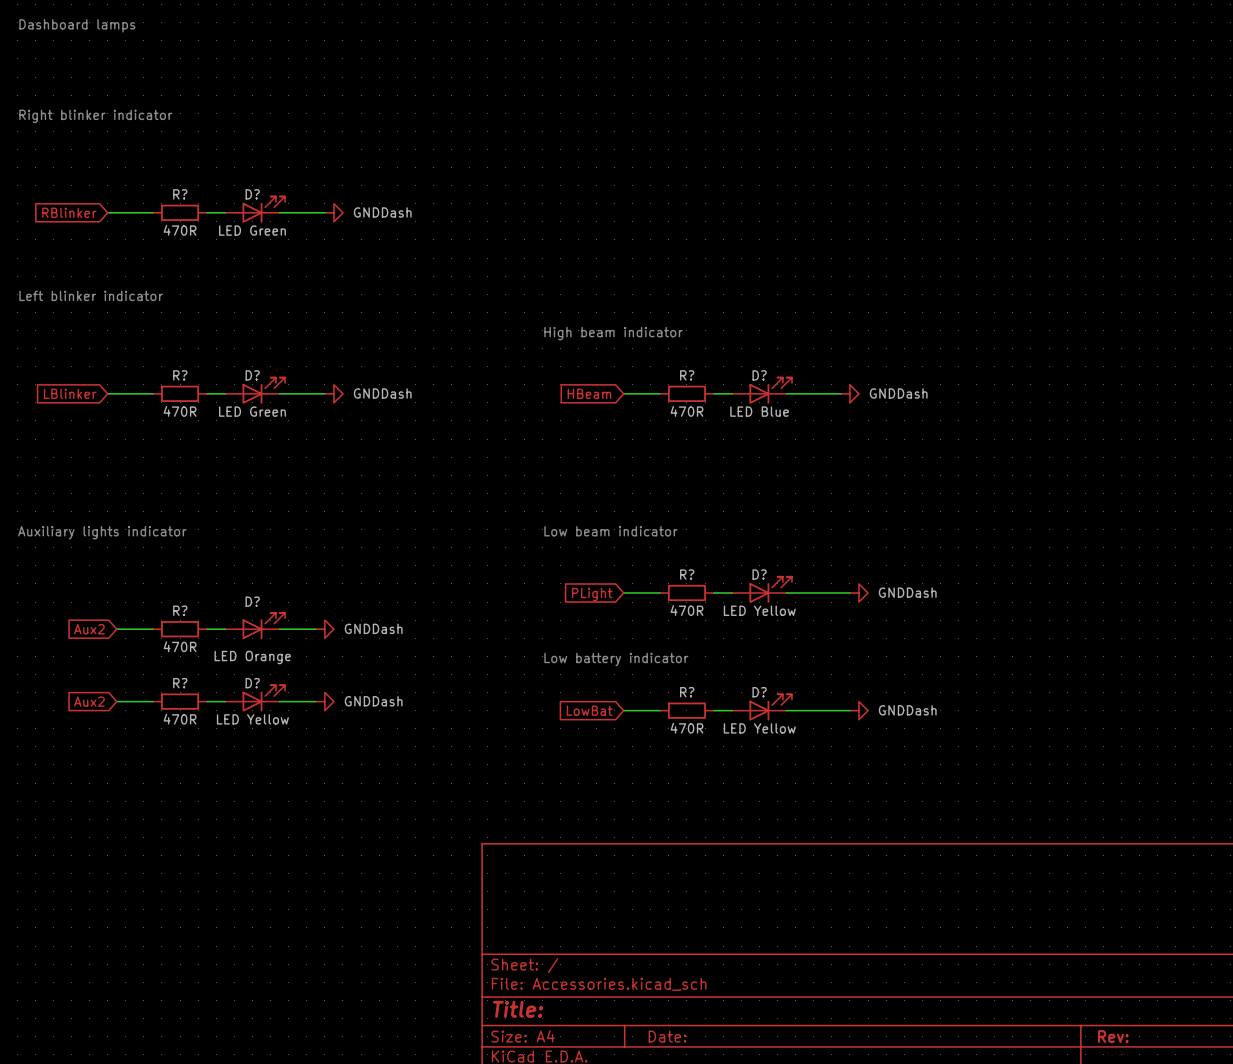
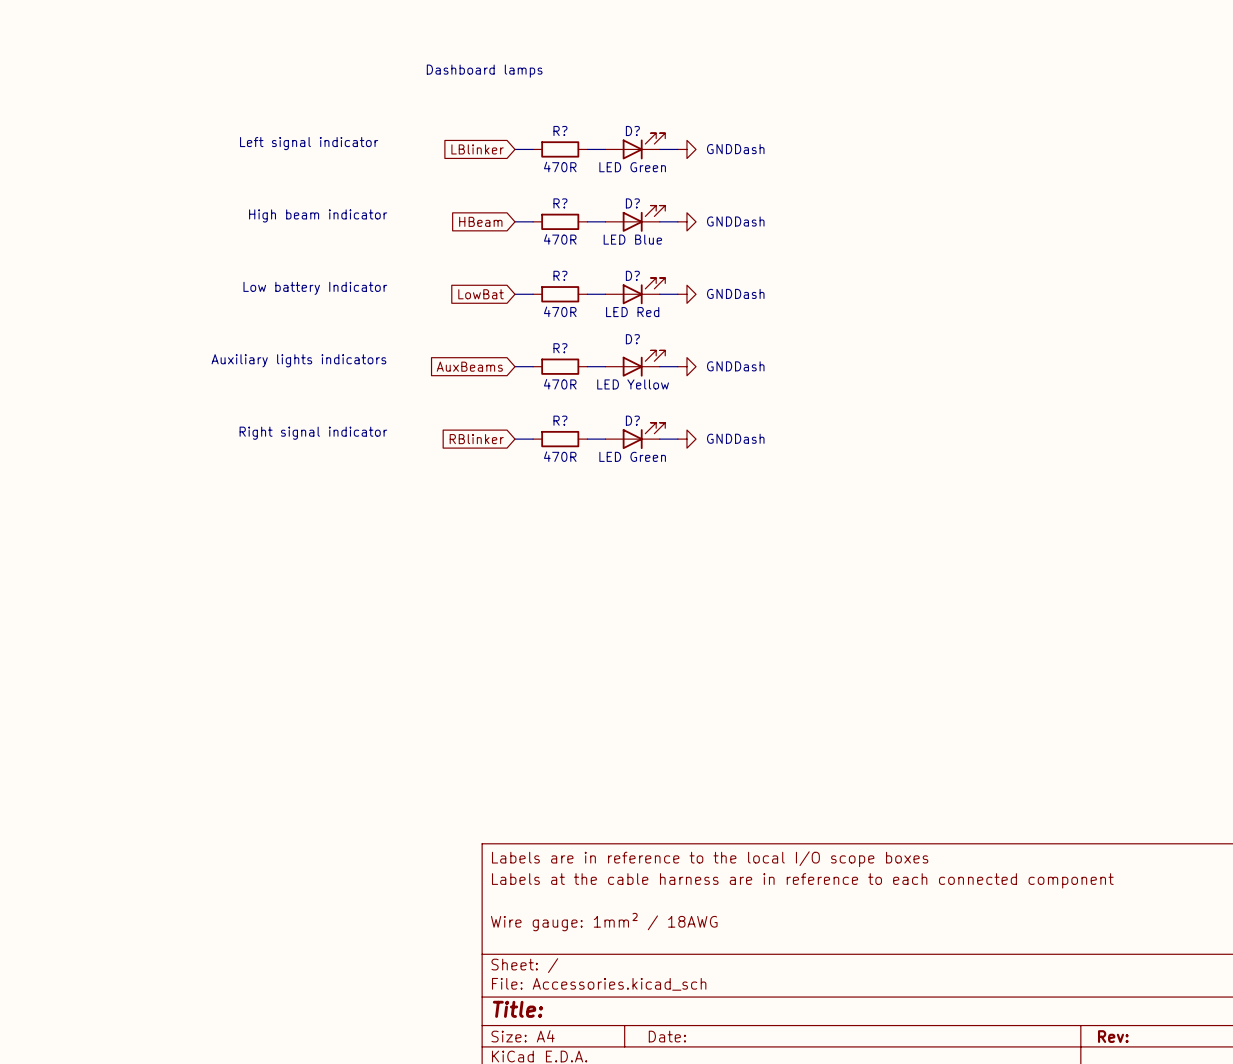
text: Dashboard lamps (77, 25) -> none
text: none -> Dashboard lamps (484, 71)
text: Right blinker indicator (95, 116) -> none
text: none -> Left signal indicator (309, 143)
D?: none -> LED Green (635, 146)
global label: none -> LBlinker (477, 149)
wire: none -> (514, 149) (533, 149)
R?: none -> 470R (560, 149)
wire: none -> (587, 149) (605, 149)
wire: none -> (659, 149) (677, 149)
power symbol: none -> GNDDash (686, 149)
D?: LED Green (255, 209) -> none
global label: RBlinker (69, 212) -> none
wire: (107, 212) (152, 212) -> none
R?: 470R (180, 212) -> none
wire: (207, 212) (225, 212) -> none
wire: (279, 212) (324, 212) -> none
power symbol: GNDDash (333, 212) -> none
text: none -> High beam indicator (318, 215)
D?: none -> LED Blue (635, 218)
global label: none -> HBeam (480, 221)
wire: none -> (514, 221) (533, 221)
R?: none -> 470R (560, 221)
wire: none -> (587, 221) (605, 221)
wire: none -> (659, 221) (677, 221)
power symbol: none -> GNDDash (686, 221)
text: none -> Low battery Indicator (315, 288)
D?: none -> LED Red (635, 291)
global label: none -> LowBat (481, 294)
wire: none -> (514, 294) (533, 294)
R?: none -> 470R (560, 294)
wire: none -> (587, 294) (605, 294)
wire: none -> (659, 294) (677, 294)
power symbol: none -> GNDDash (686, 294)
text: Left blinker indicator (91, 295) -> none
text: High beam indicator (613, 333) -> none
text: none -> Auxiliary lights indicators (298, 360)
D?: none -> LED Yellow (635, 363)
global label: none -> AuxBeams (469, 366)
wire: none -> (514, 366) (533, 366)
R?: none -> 470R (560, 366)
wire: none -> (587, 366) (605, 366)
power symbol: none -> GNDDash (686, 366)
D?: LED Green (255, 390) -> none
D?: LED Blue (762, 390) -> none
global label: LBlinker (70, 393) -> none
wire: (107, 393) (152, 393) -> none
R?: 470R (180, 393) -> none
wire: (207, 393) (225, 393) -> none
wire: (279, 393) (324, 393) -> none
power symbol: GNDDash (333, 393) -> none
global label: HBeam (589, 393) -> none
wire: (623, 393) (659, 393) -> none
R?: 470R (686, 393) -> none
wire: (714, 393) (732, 393) -> (659, 366) (677, 366)
wire: (786, 393) (840, 393) -> none
power symbol: GNDDash (849, 393) -> none
text: none -> Right signal indicator (313, 433)
D?: none -> LED Green (635, 435)
global label: none -> RBlinker (476, 439)
wire: none -> (514, 439) (533, 439)
R?: none -> 470R (560, 439)
wire: none -> (587, 439) (605, 439)
power symbol: none -> GNDDash (686, 439)
text: Low beam indicator (610, 531) -> none
text: Auxiliary lights indicator (102, 532) -> none
D?: LED Yellow (762, 589) -> none
wire: (623, 592) (659, 592) -> none
R?: 470R (686, 592) -> none
wire: (714, 592) (732, 592) -> (659, 439) (677, 439)
wire: (786, 592) (849, 592) -> none
power symbol: GNDDash (858, 592) -> none
global label: PLight (592, 594) -> none
D?: LED Orange (255, 626) -> none
global label: Aux2 (89, 629) -> none
wire: (116, 629) (152, 629) -> none
R?: 470R (180, 629) -> none
wire: (207, 629) (225, 629) -> none
wire: (279, 629) (315, 629) -> none
power symbol: GNDDash (324, 629) -> none
text: Low battery indicator (616, 659) -> none
D?: LED Yellow (255, 698) -> none
global label: Aux2 (89, 701) -> none
wire: (116, 701) (152, 701) -> none
R?: 470R (180, 701) -> none
wire: (207, 701) (225, 701) -> none
wire: (279, 701) (315, 701) -> none
power symbol: GNDDash (324, 701) -> none
D?: LED Yellow (762, 707) -> none
global label: LowBat (589, 710) -> none
wire: (623, 710) (659, 710) -> none
R?: 470R (686, 710) -> none
wire: (714, 710) (732, 710) -> none
wire: (786, 710) (849, 710) -> none
power symbol: GNDDash (858, 710) -> none
title block: none -> Labels are in reference to the local I/O scope boxes (710, 859)
title block: none -> Labels at the cable harness are in reference to each connected component (802, 880)
title block: none -> Wire gauge: 1mm² / 18AWG (604, 922)

